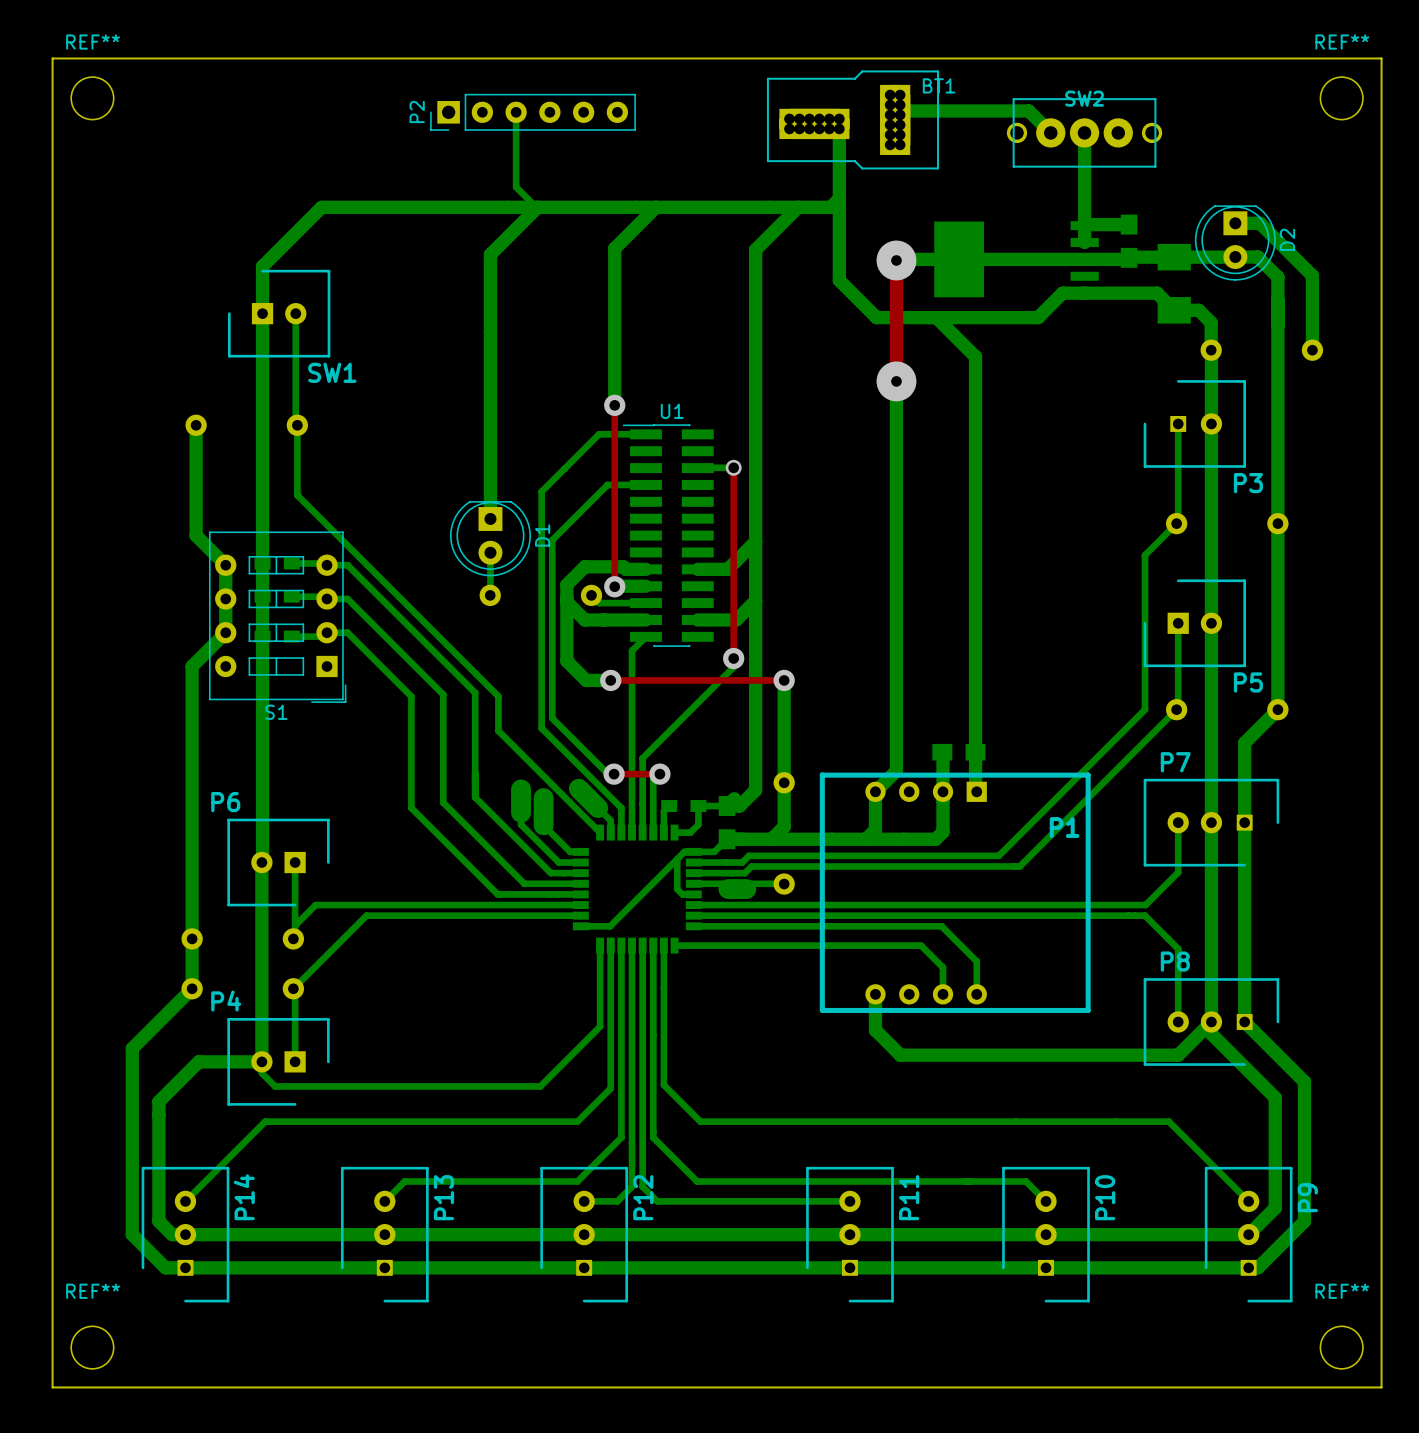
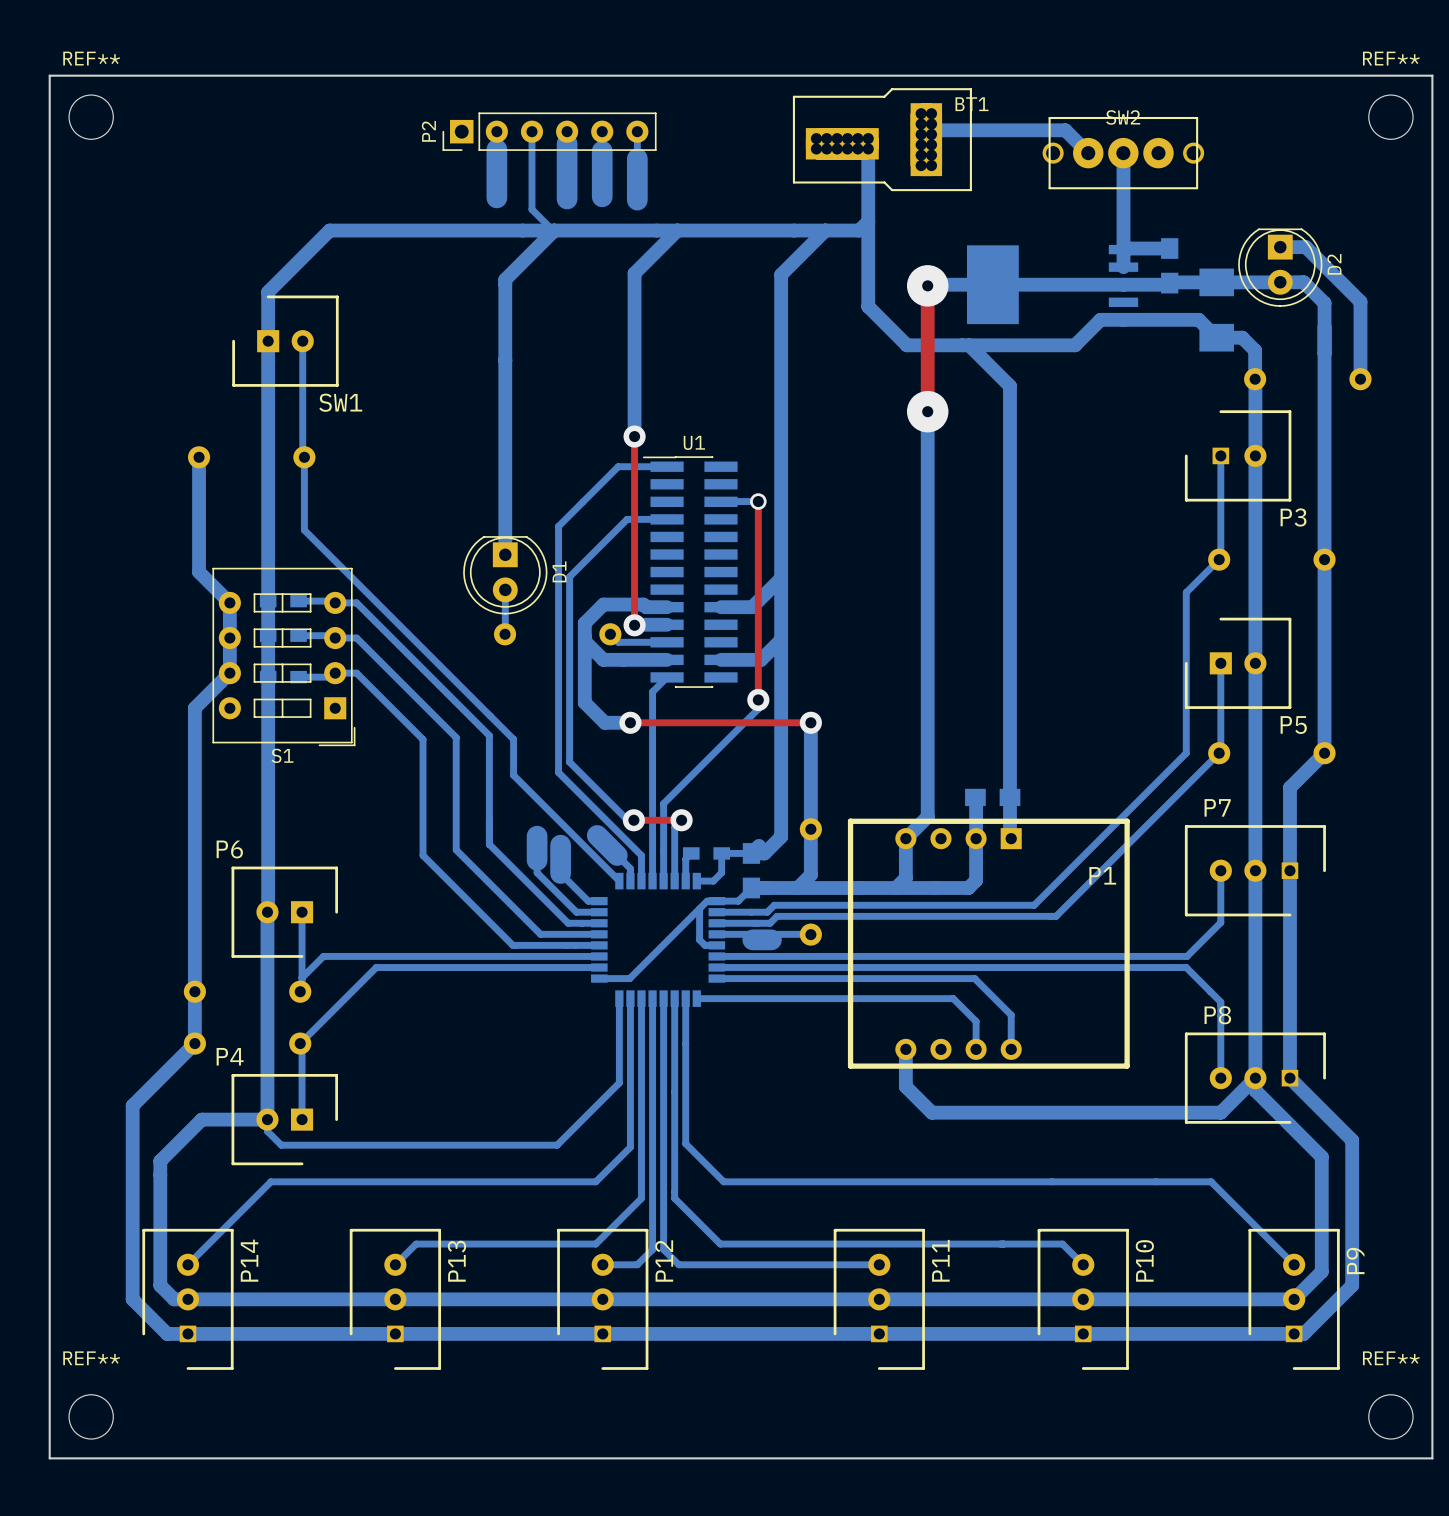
bottom track: none -> (496, 131) (496, 197)
bottom track: none -> (567, 131) (567, 199)
bottom track: none -> (602, 131) (602, 196)
bottom track: none -> (637, 131) (637, 200)

